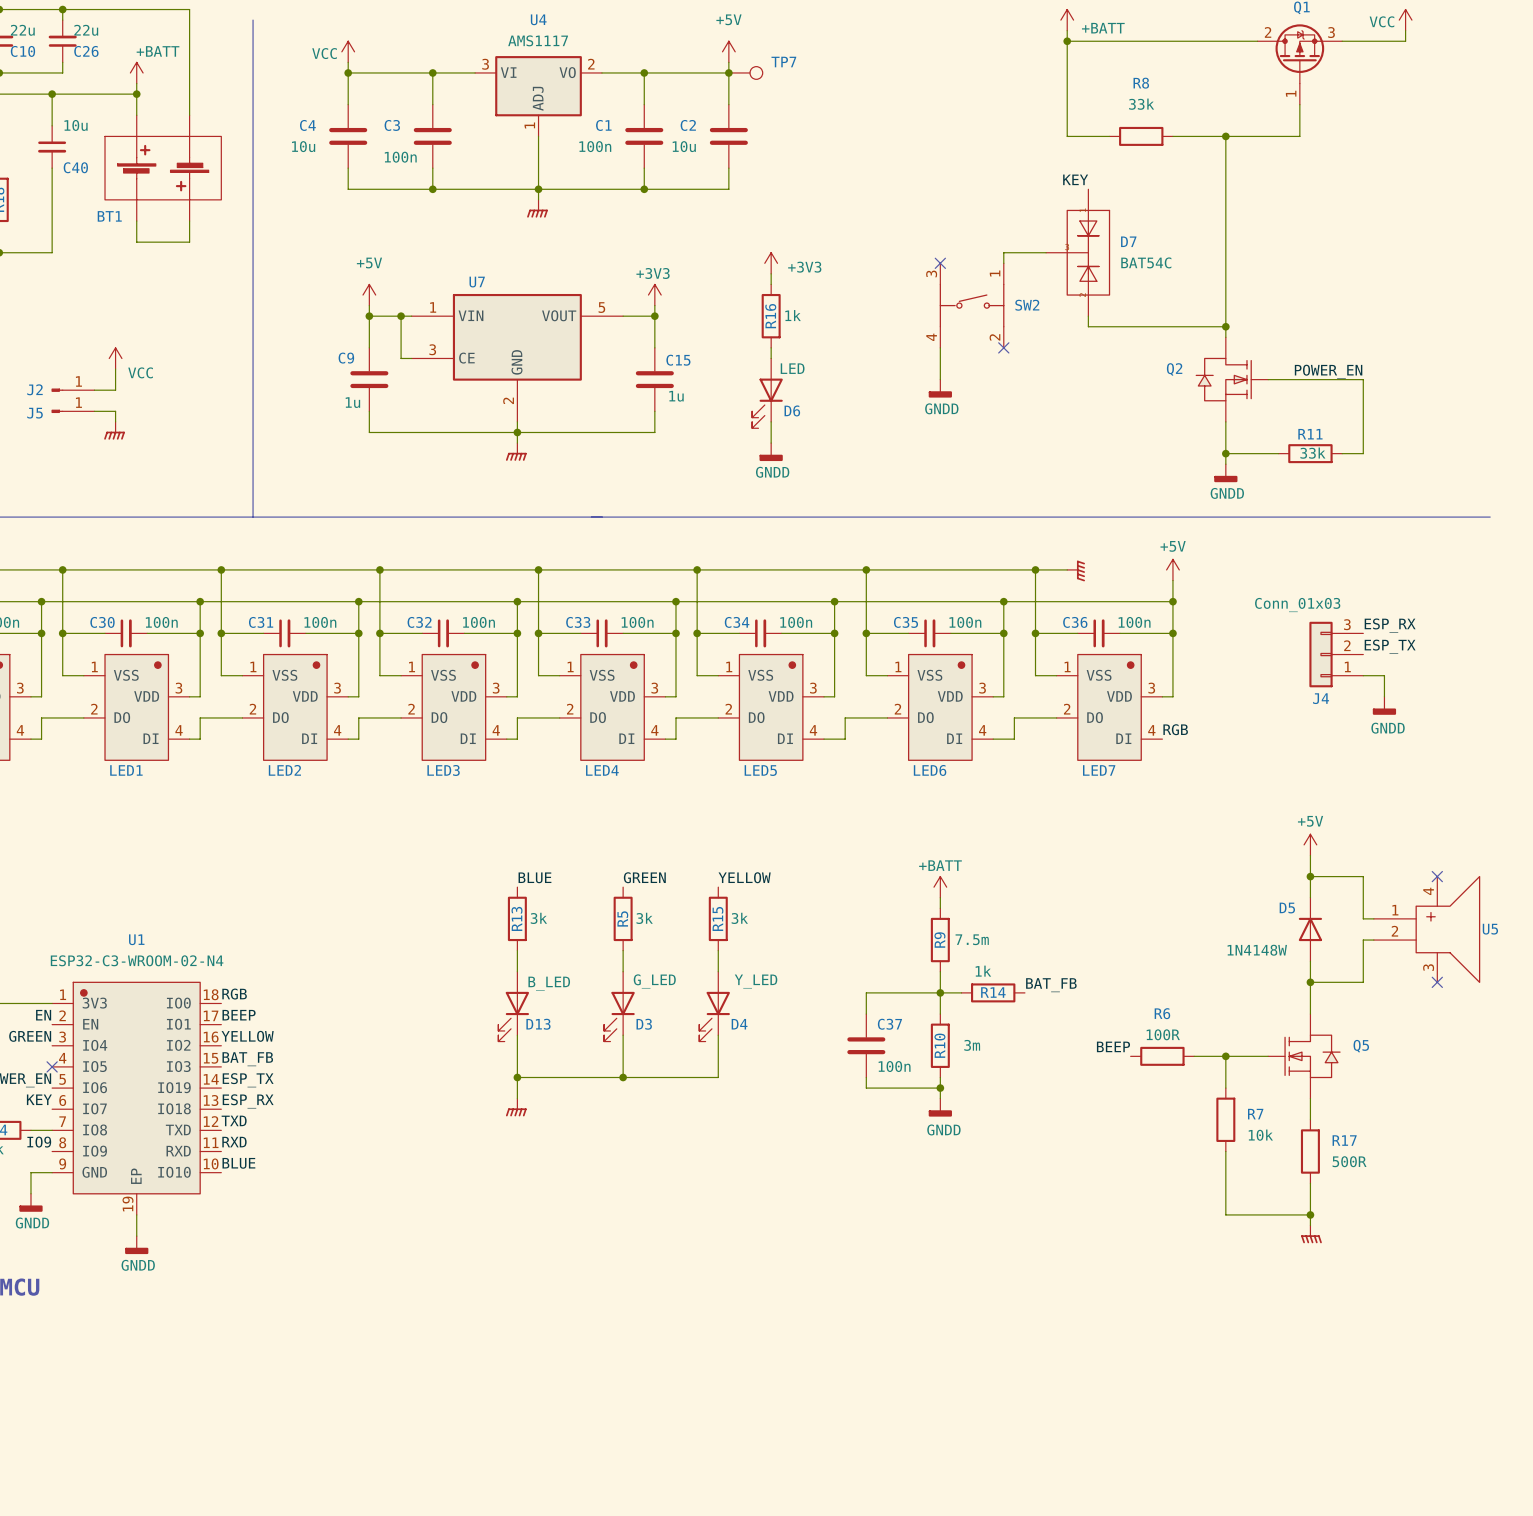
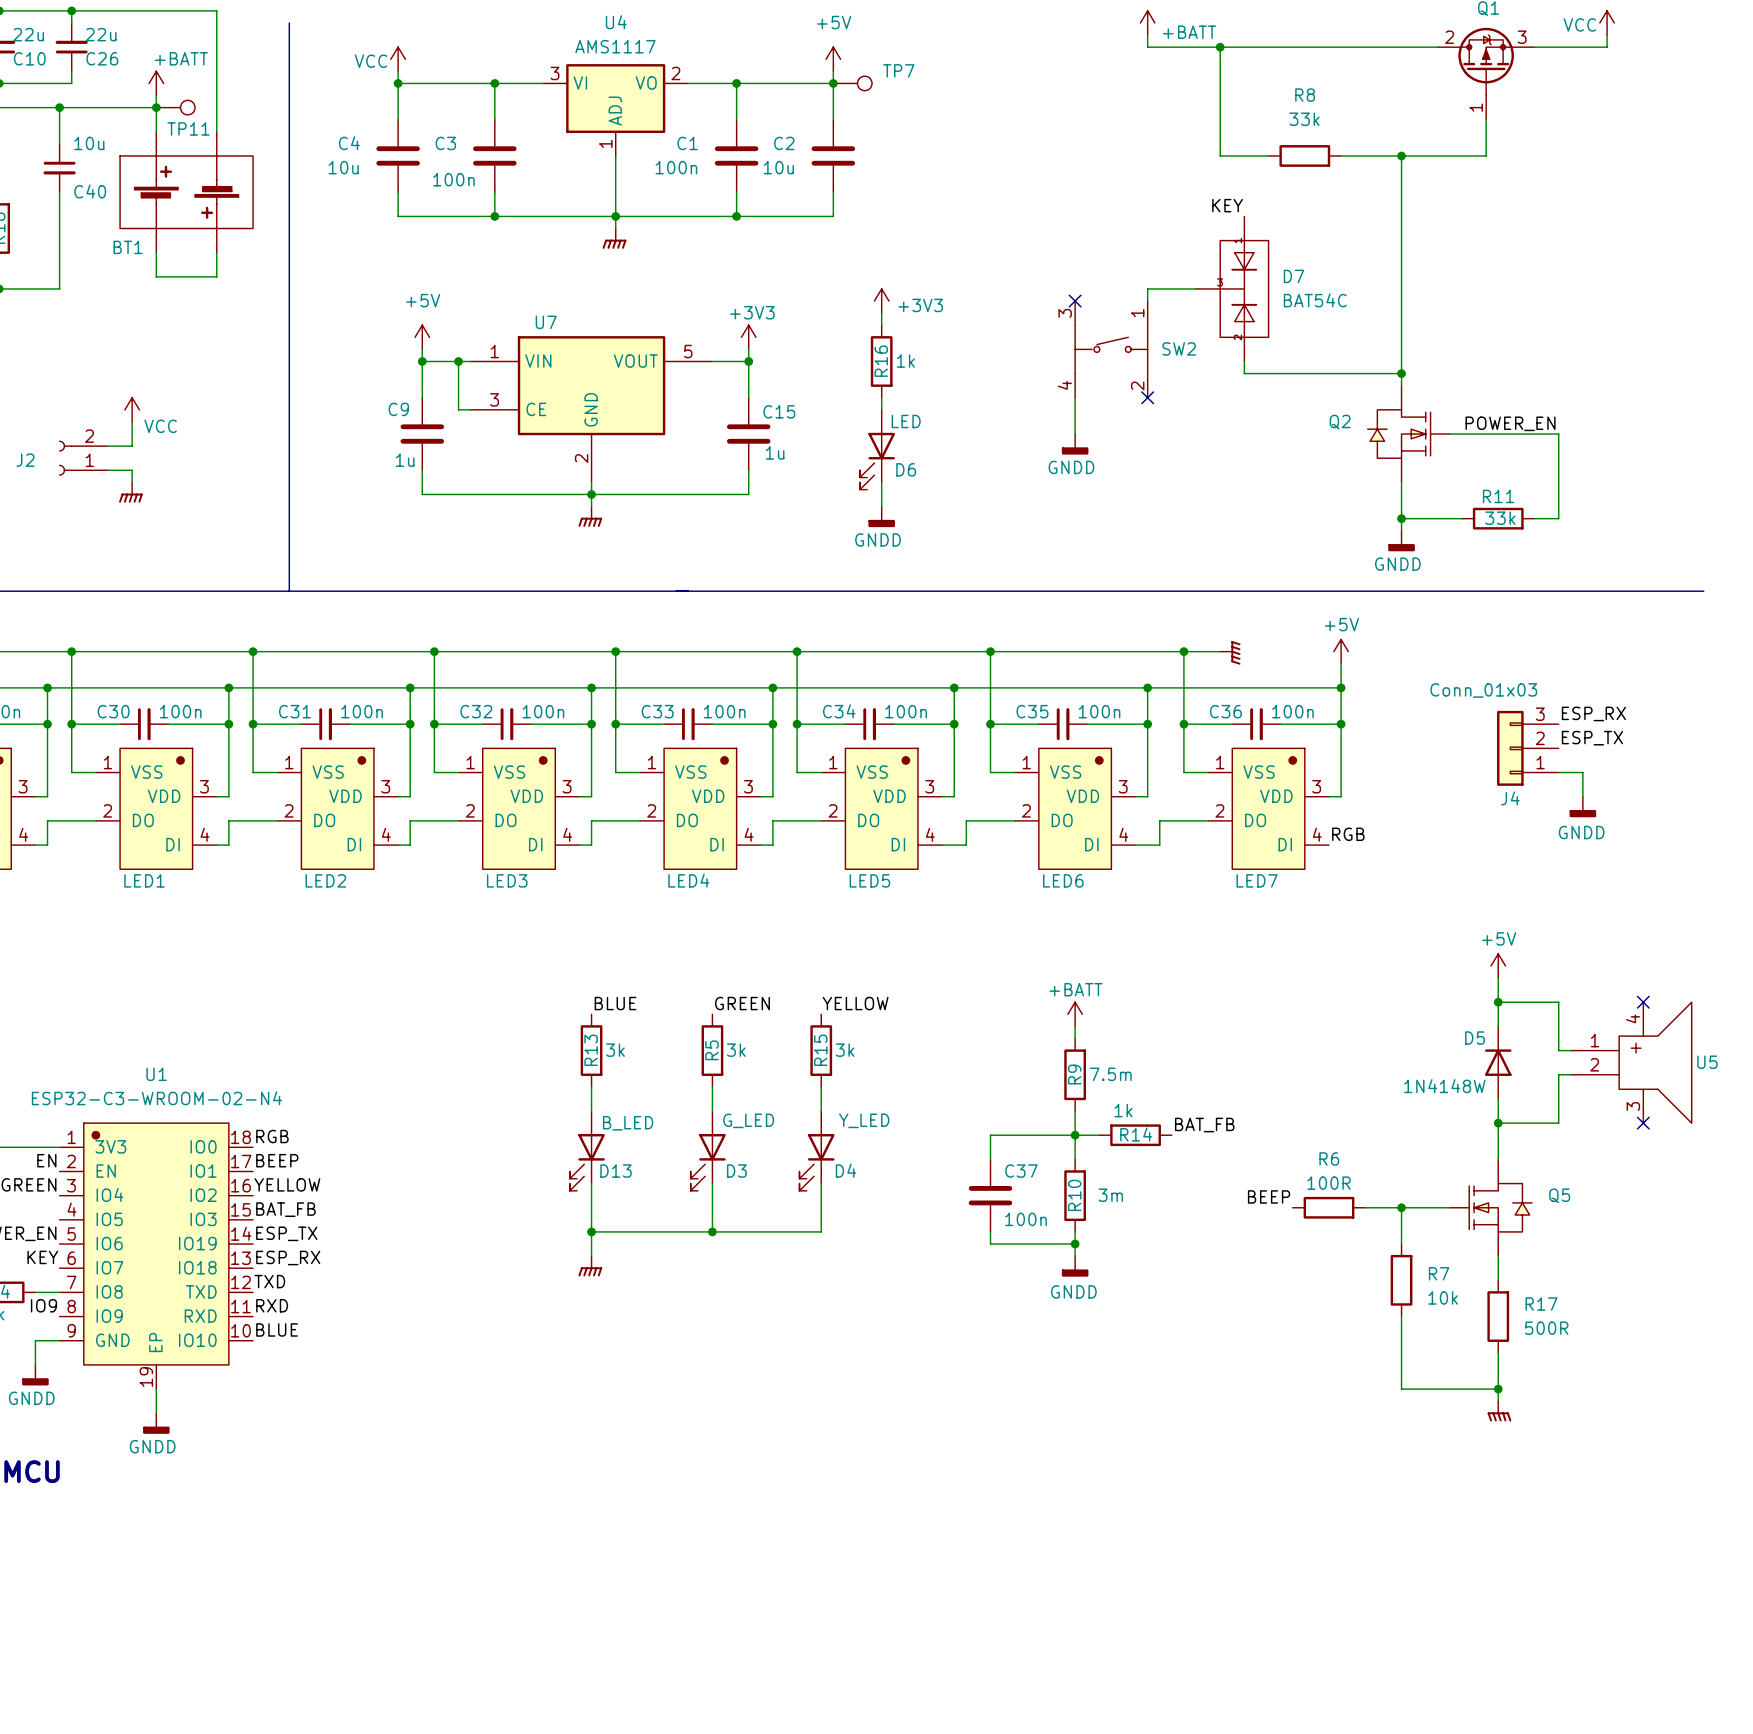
power symbol position: +BATT (1067, 20) -> +BATT (1147, 22)
wire: (1067, 30) (1067, 41) -> (1147, 35) (1147, 47) (1220, 47)
TP11: none -> (175, 107)
J2 symbol: [51, 388, 95, 392] -> [58, 440, 108, 476]
J5: (72, 411) -> none
no-connect mark: (52, 1066) -> none

